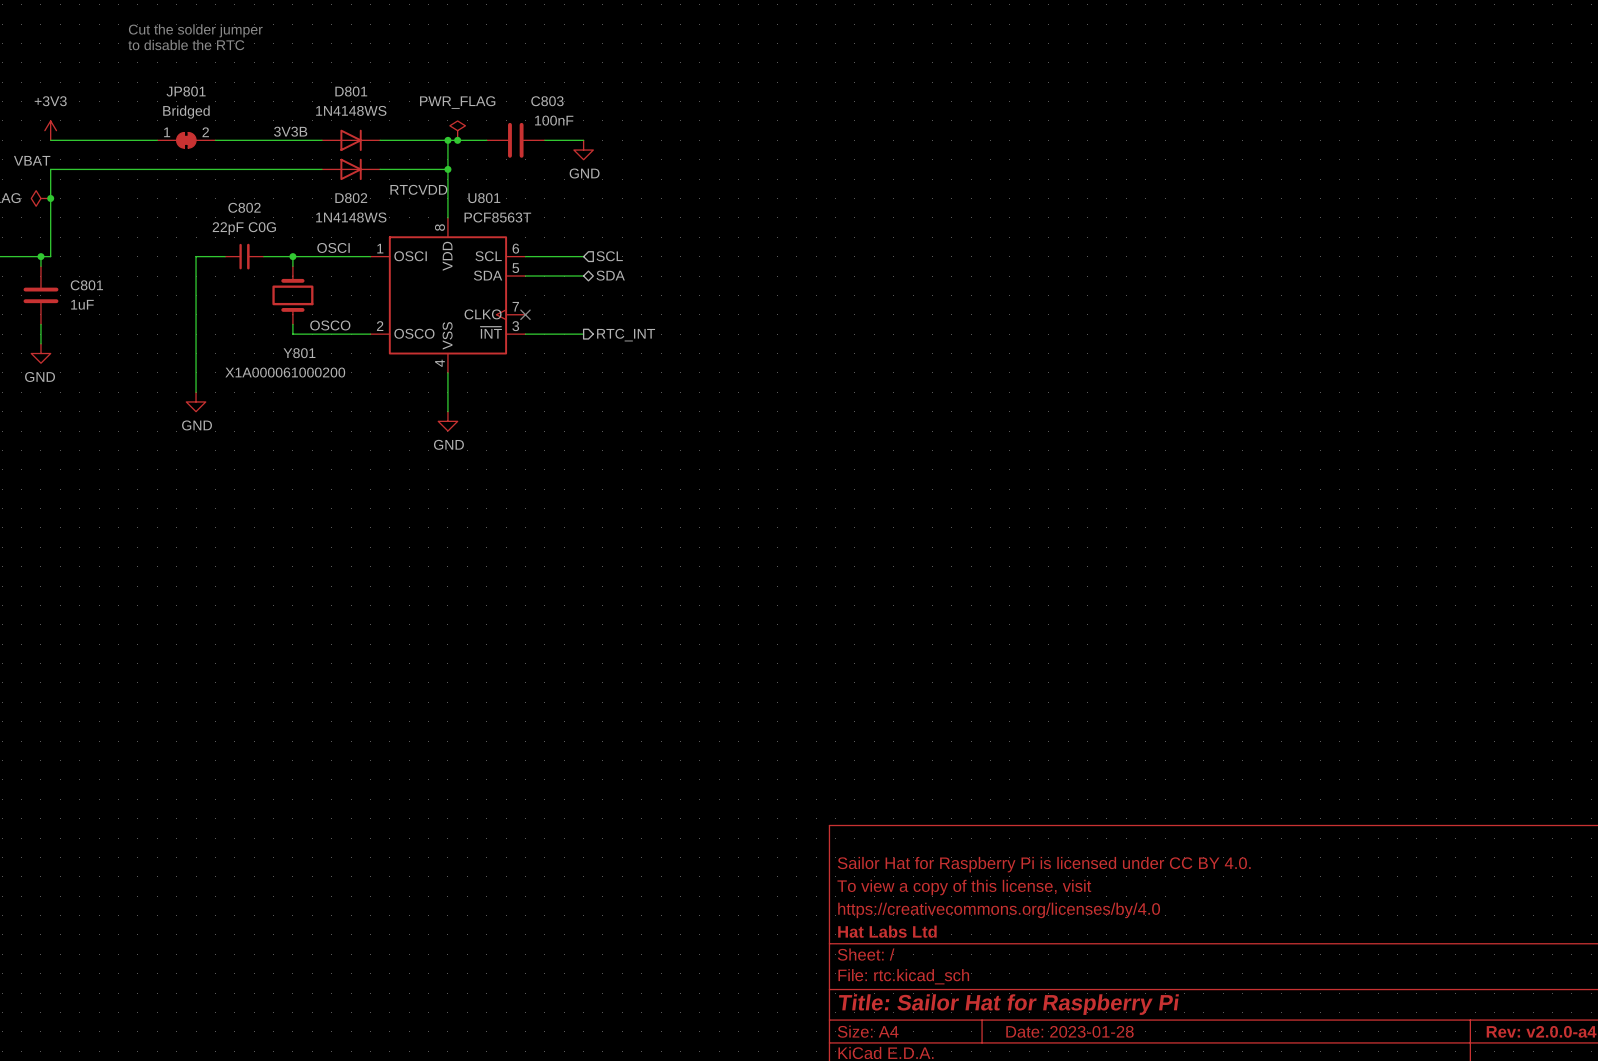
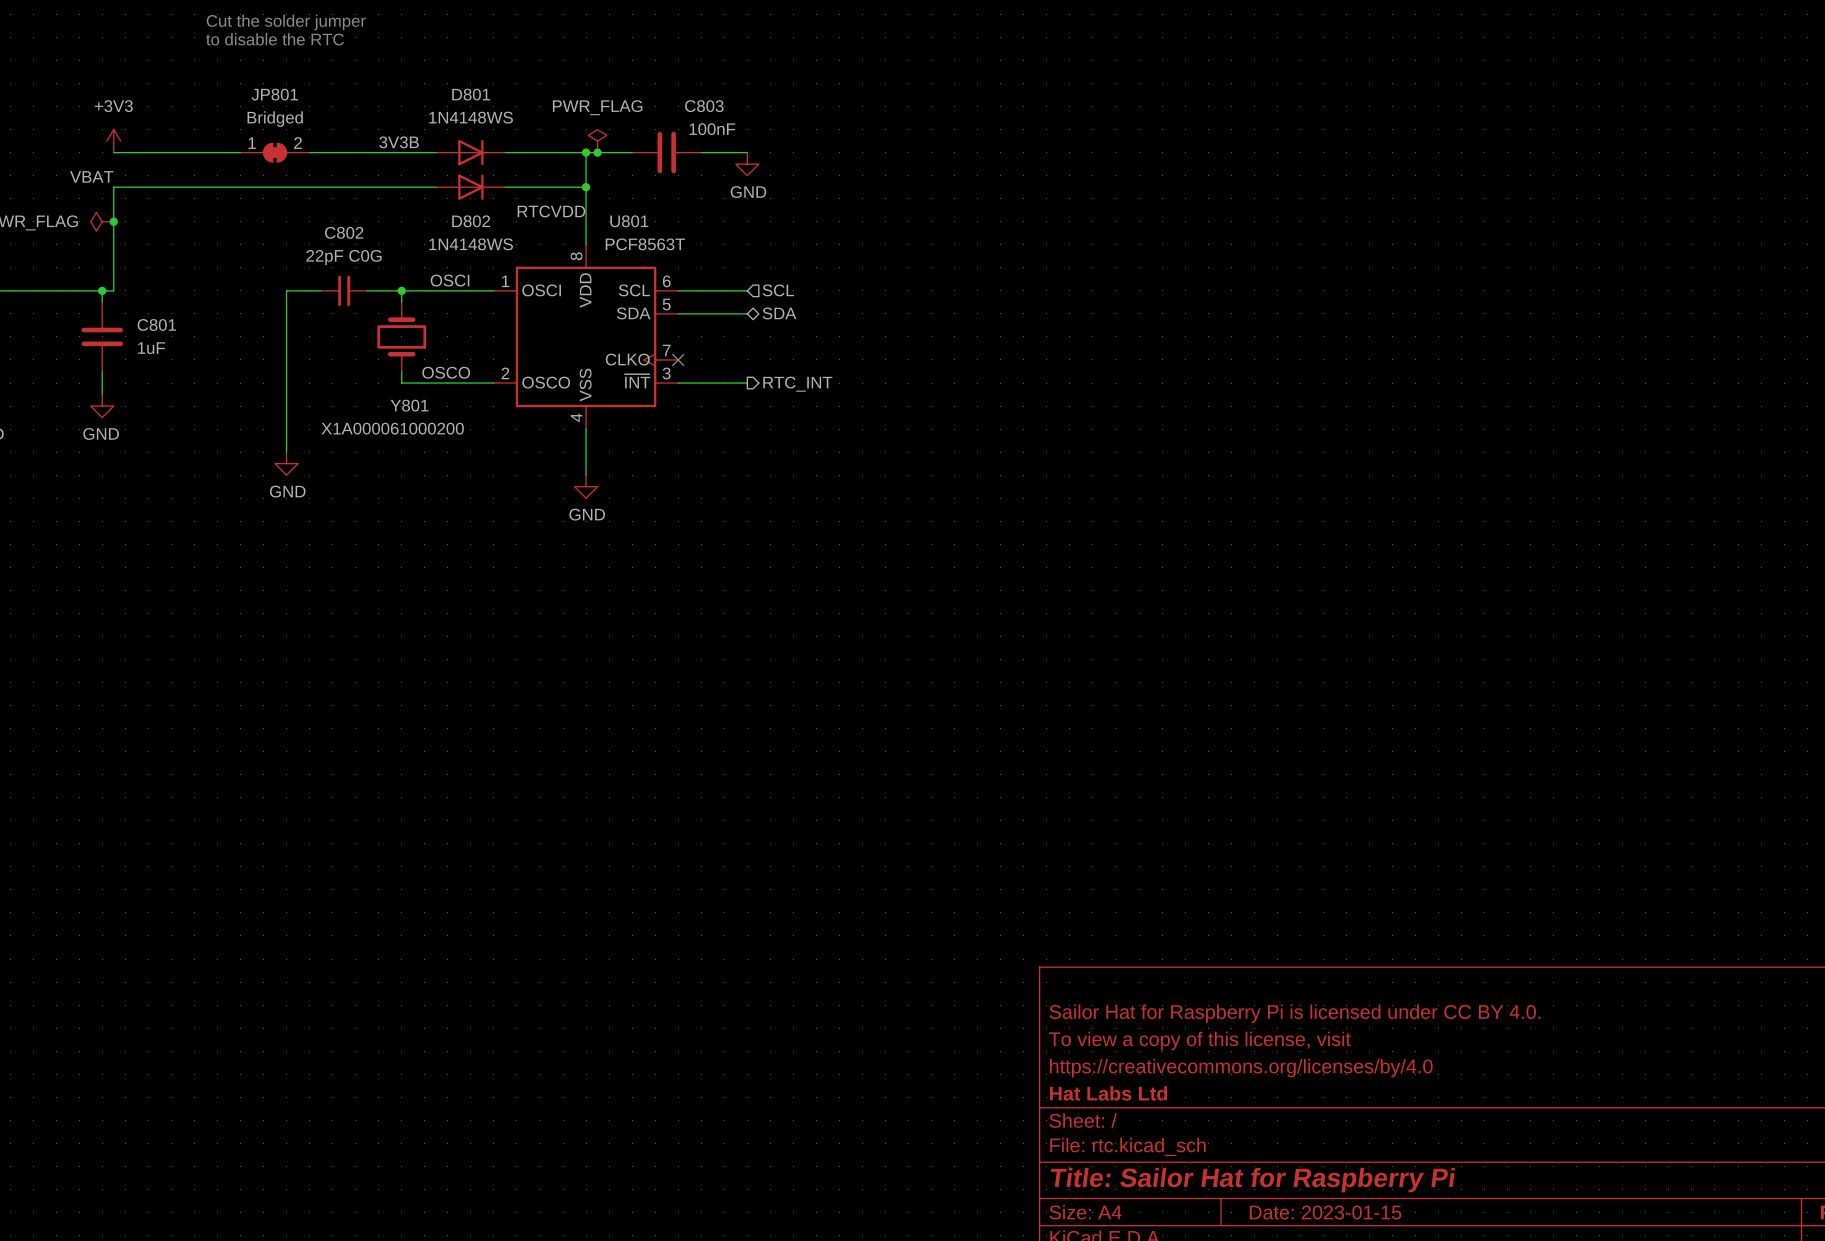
title block: Date: 2023-01-28 (1069, 1031) -> Date: 2023-01-15 (1325, 1212)

